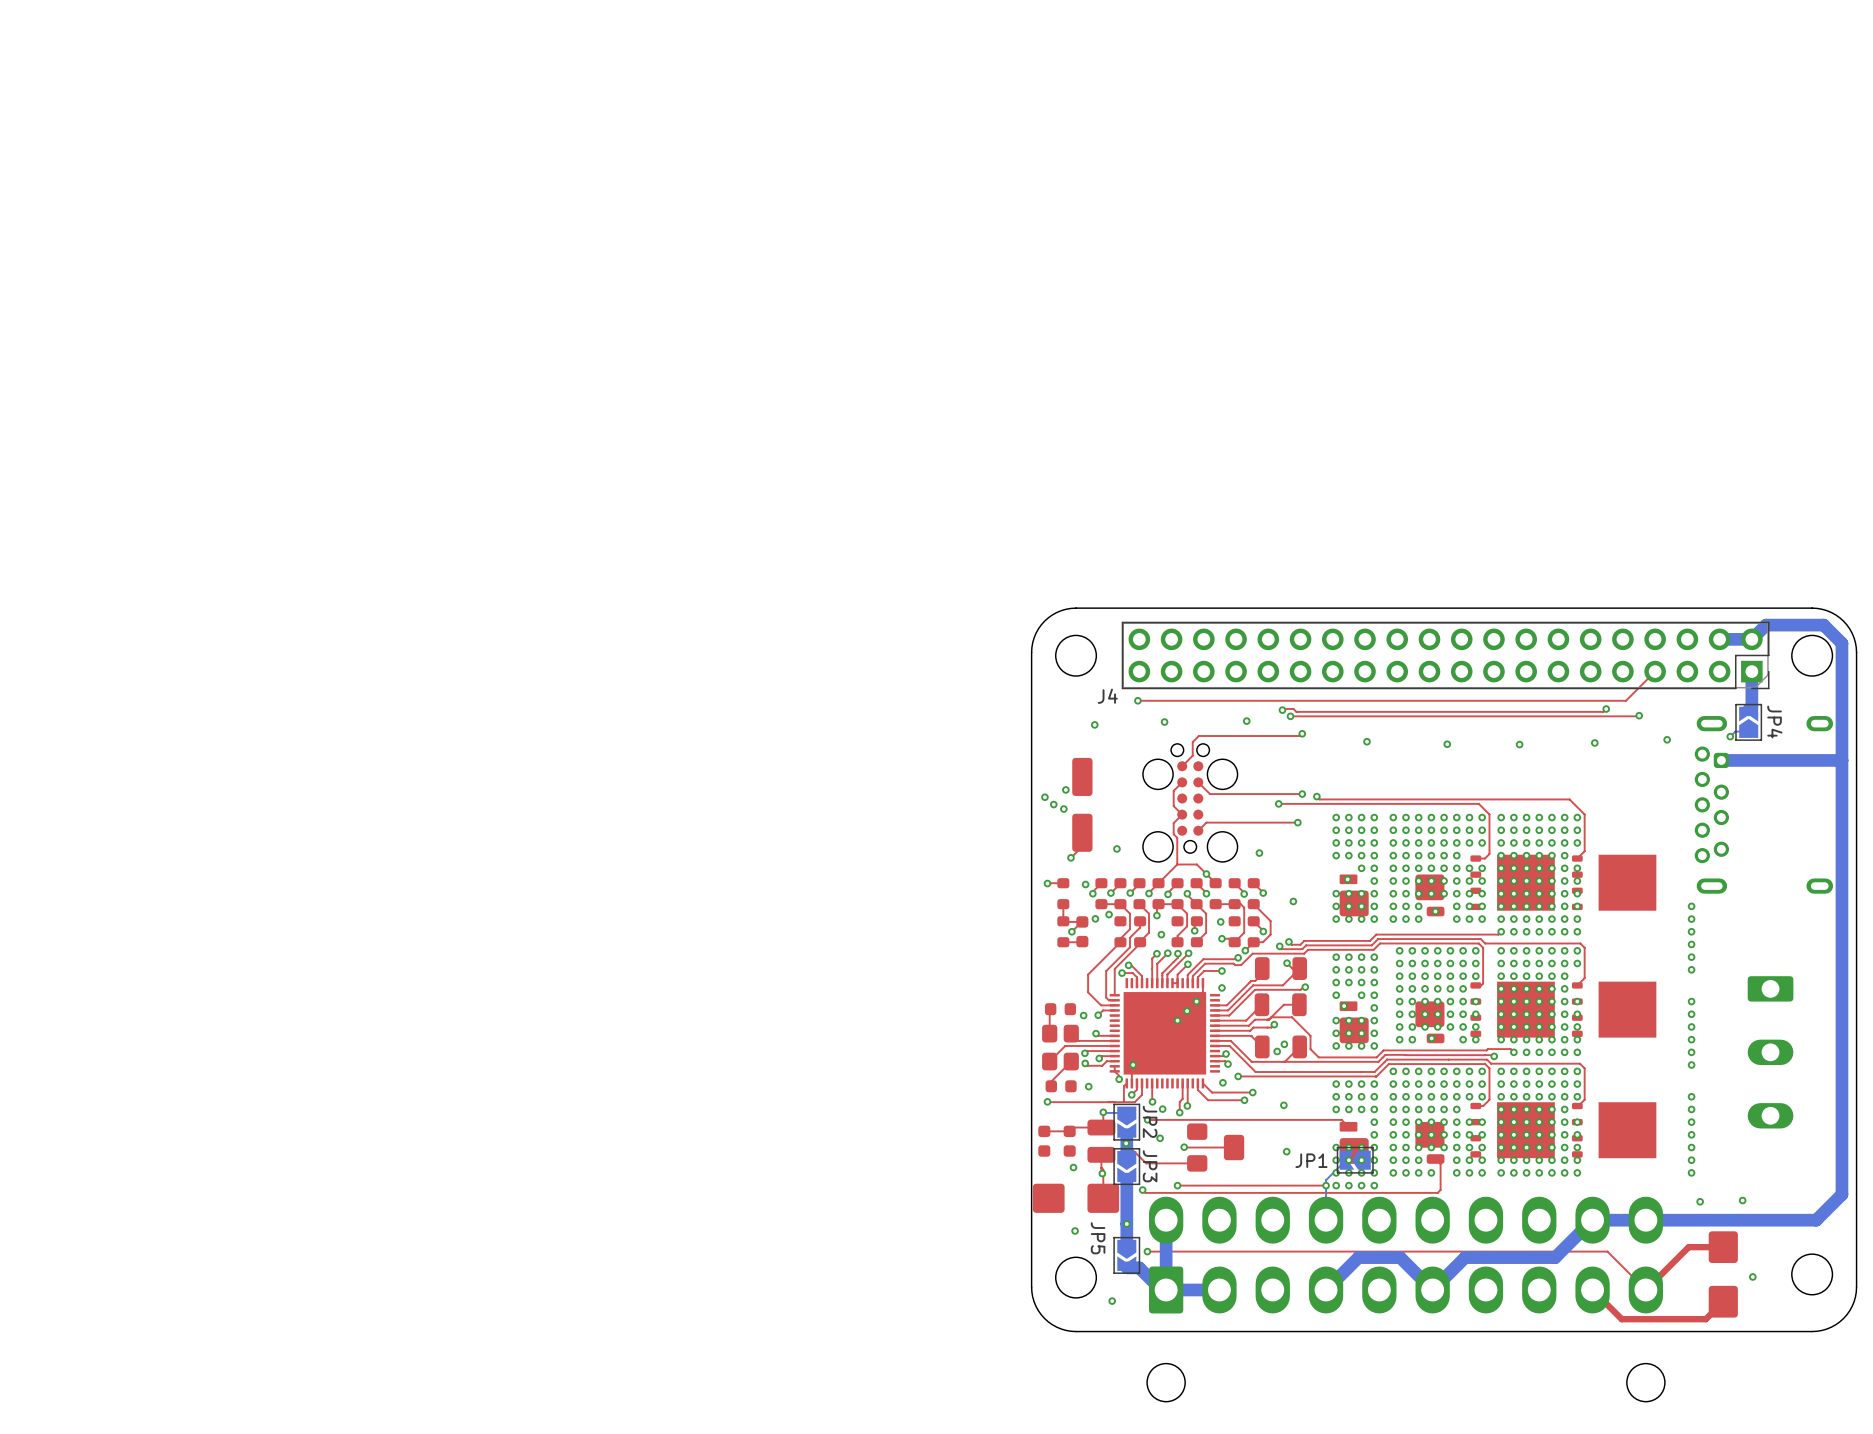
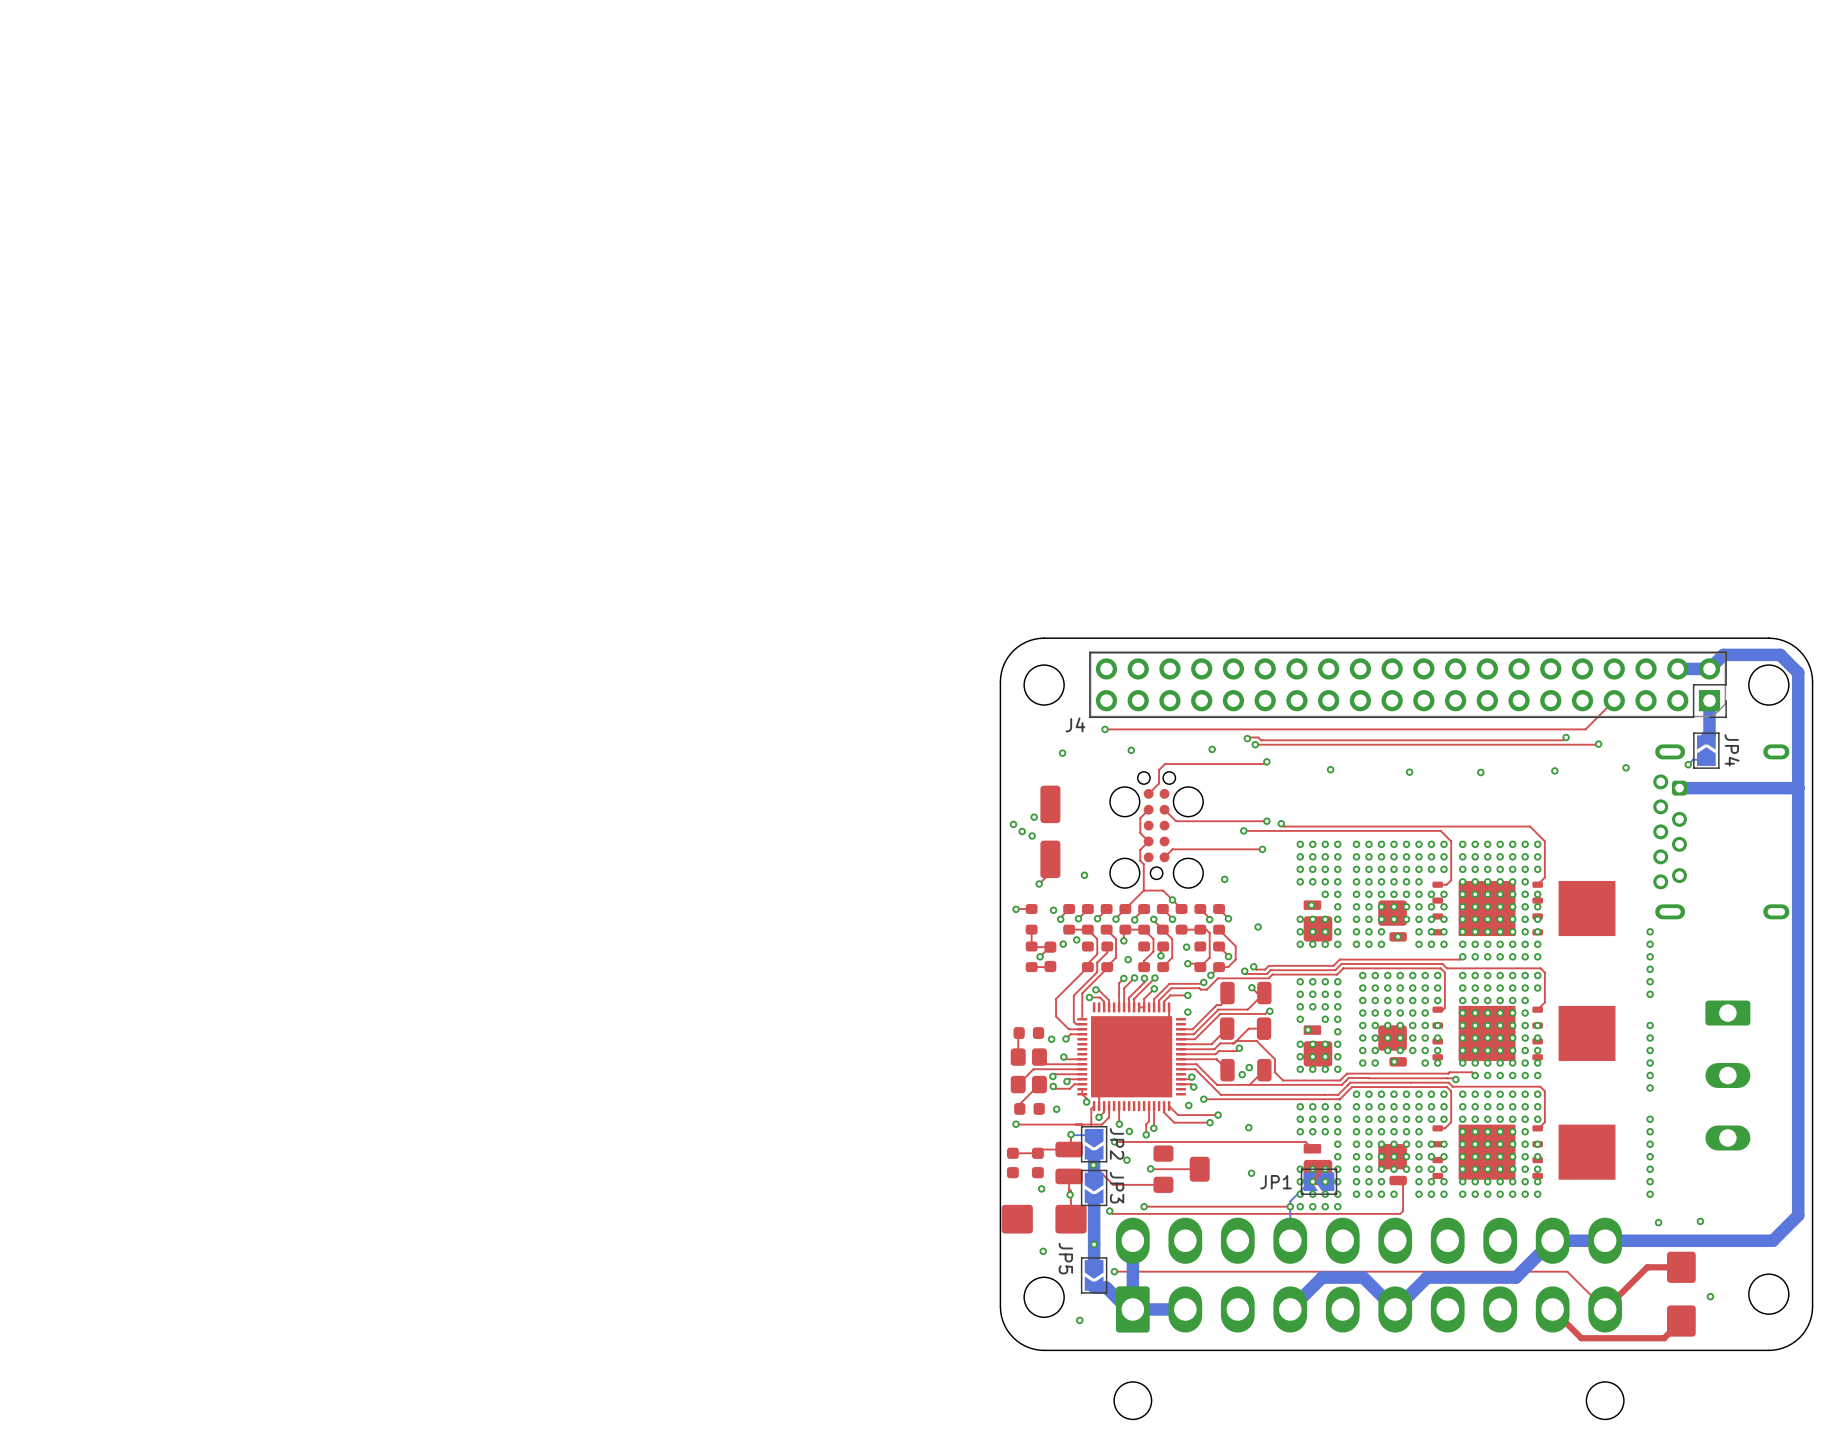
via: (1196, 1001) -> none
via: (1187, 1011) -> none
via: (1177, 1020) -> none
via: (1133, 1065) -> none

